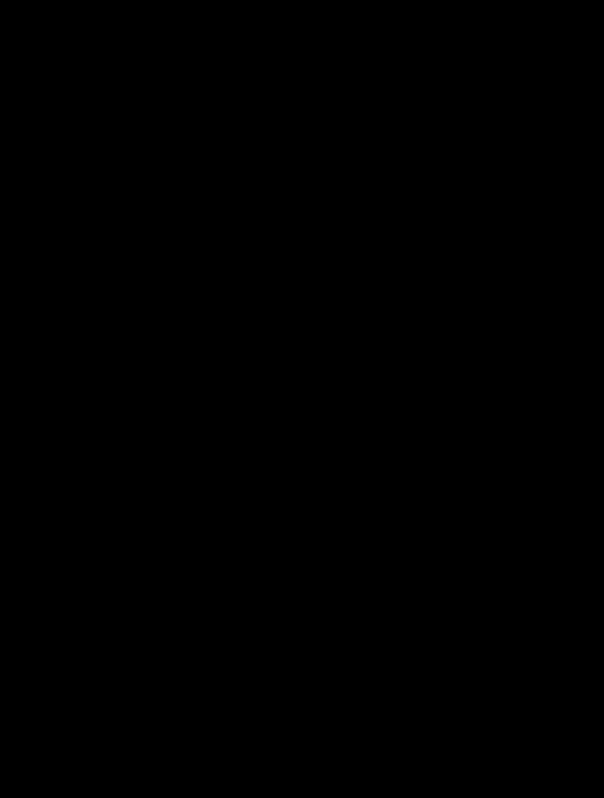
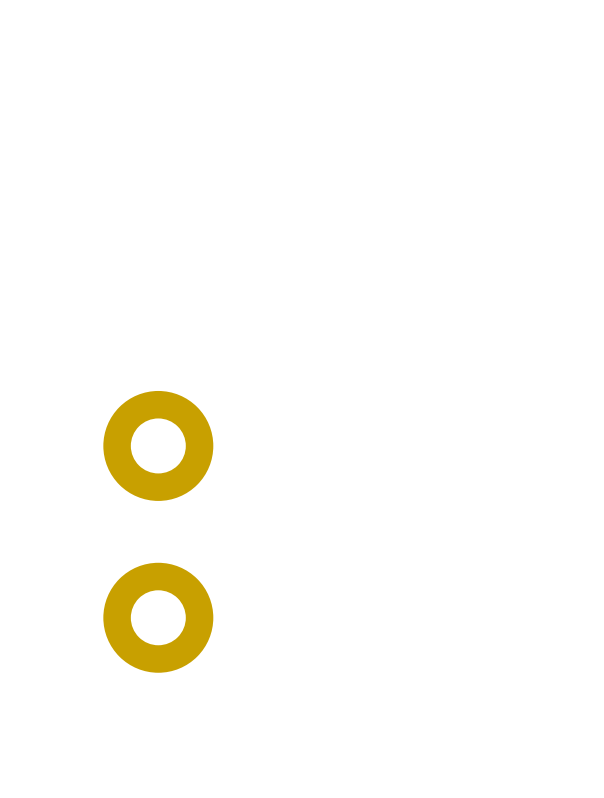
part: none -> (158, 531)

